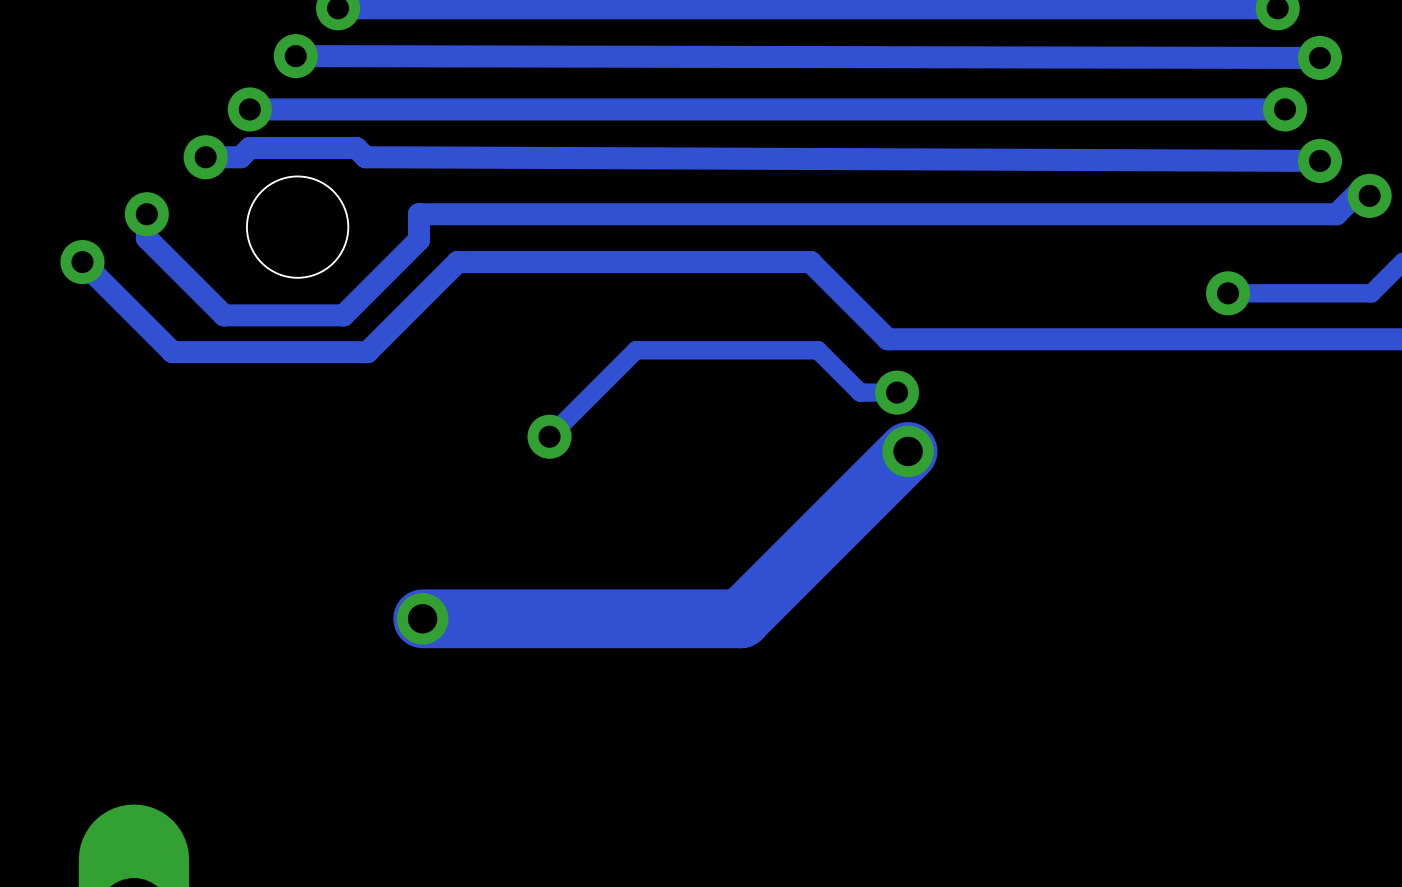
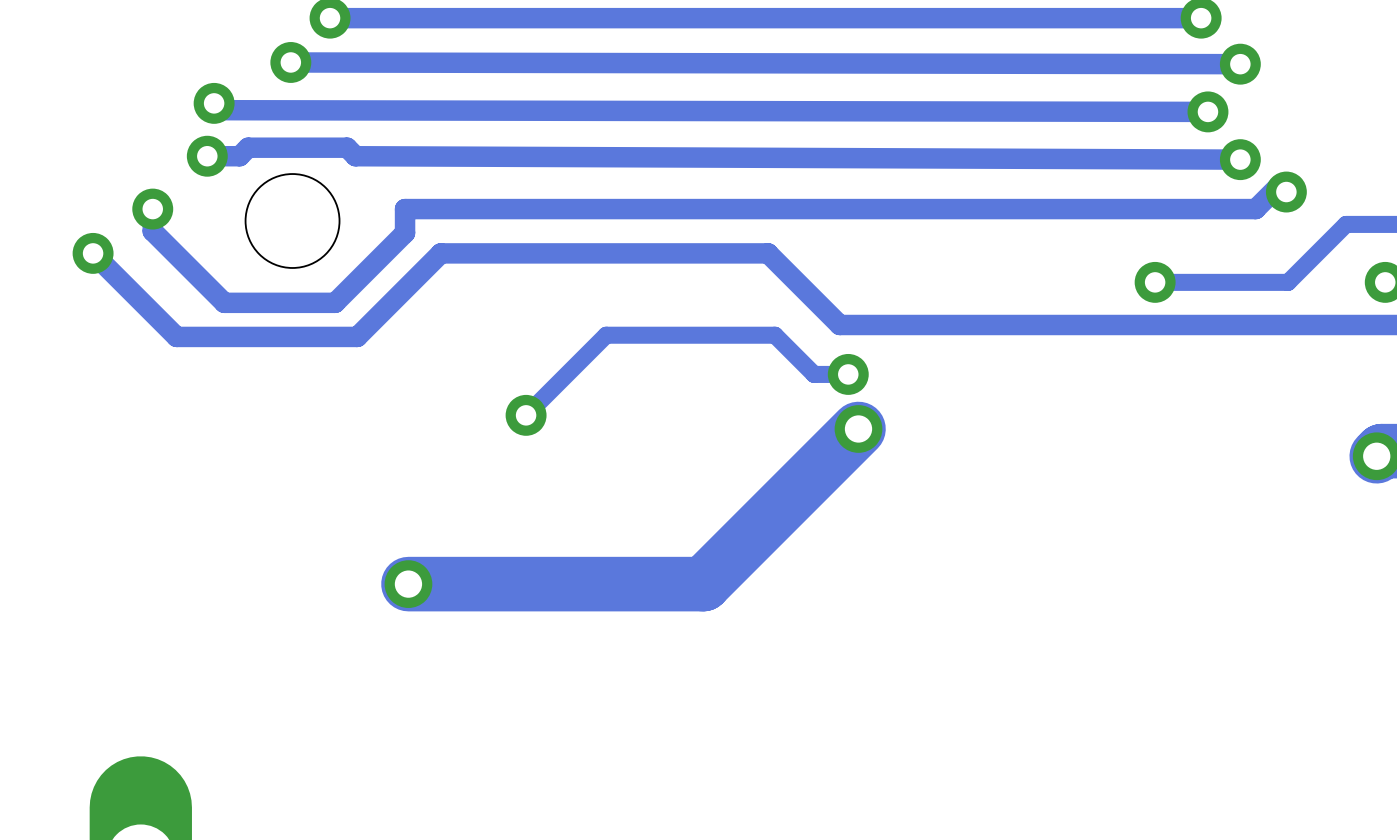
via position: (249, 109) -> (214, 103)
track: (1285, 109) (249, 109) -> (1207, 111) (220, 110) (214, 103)

